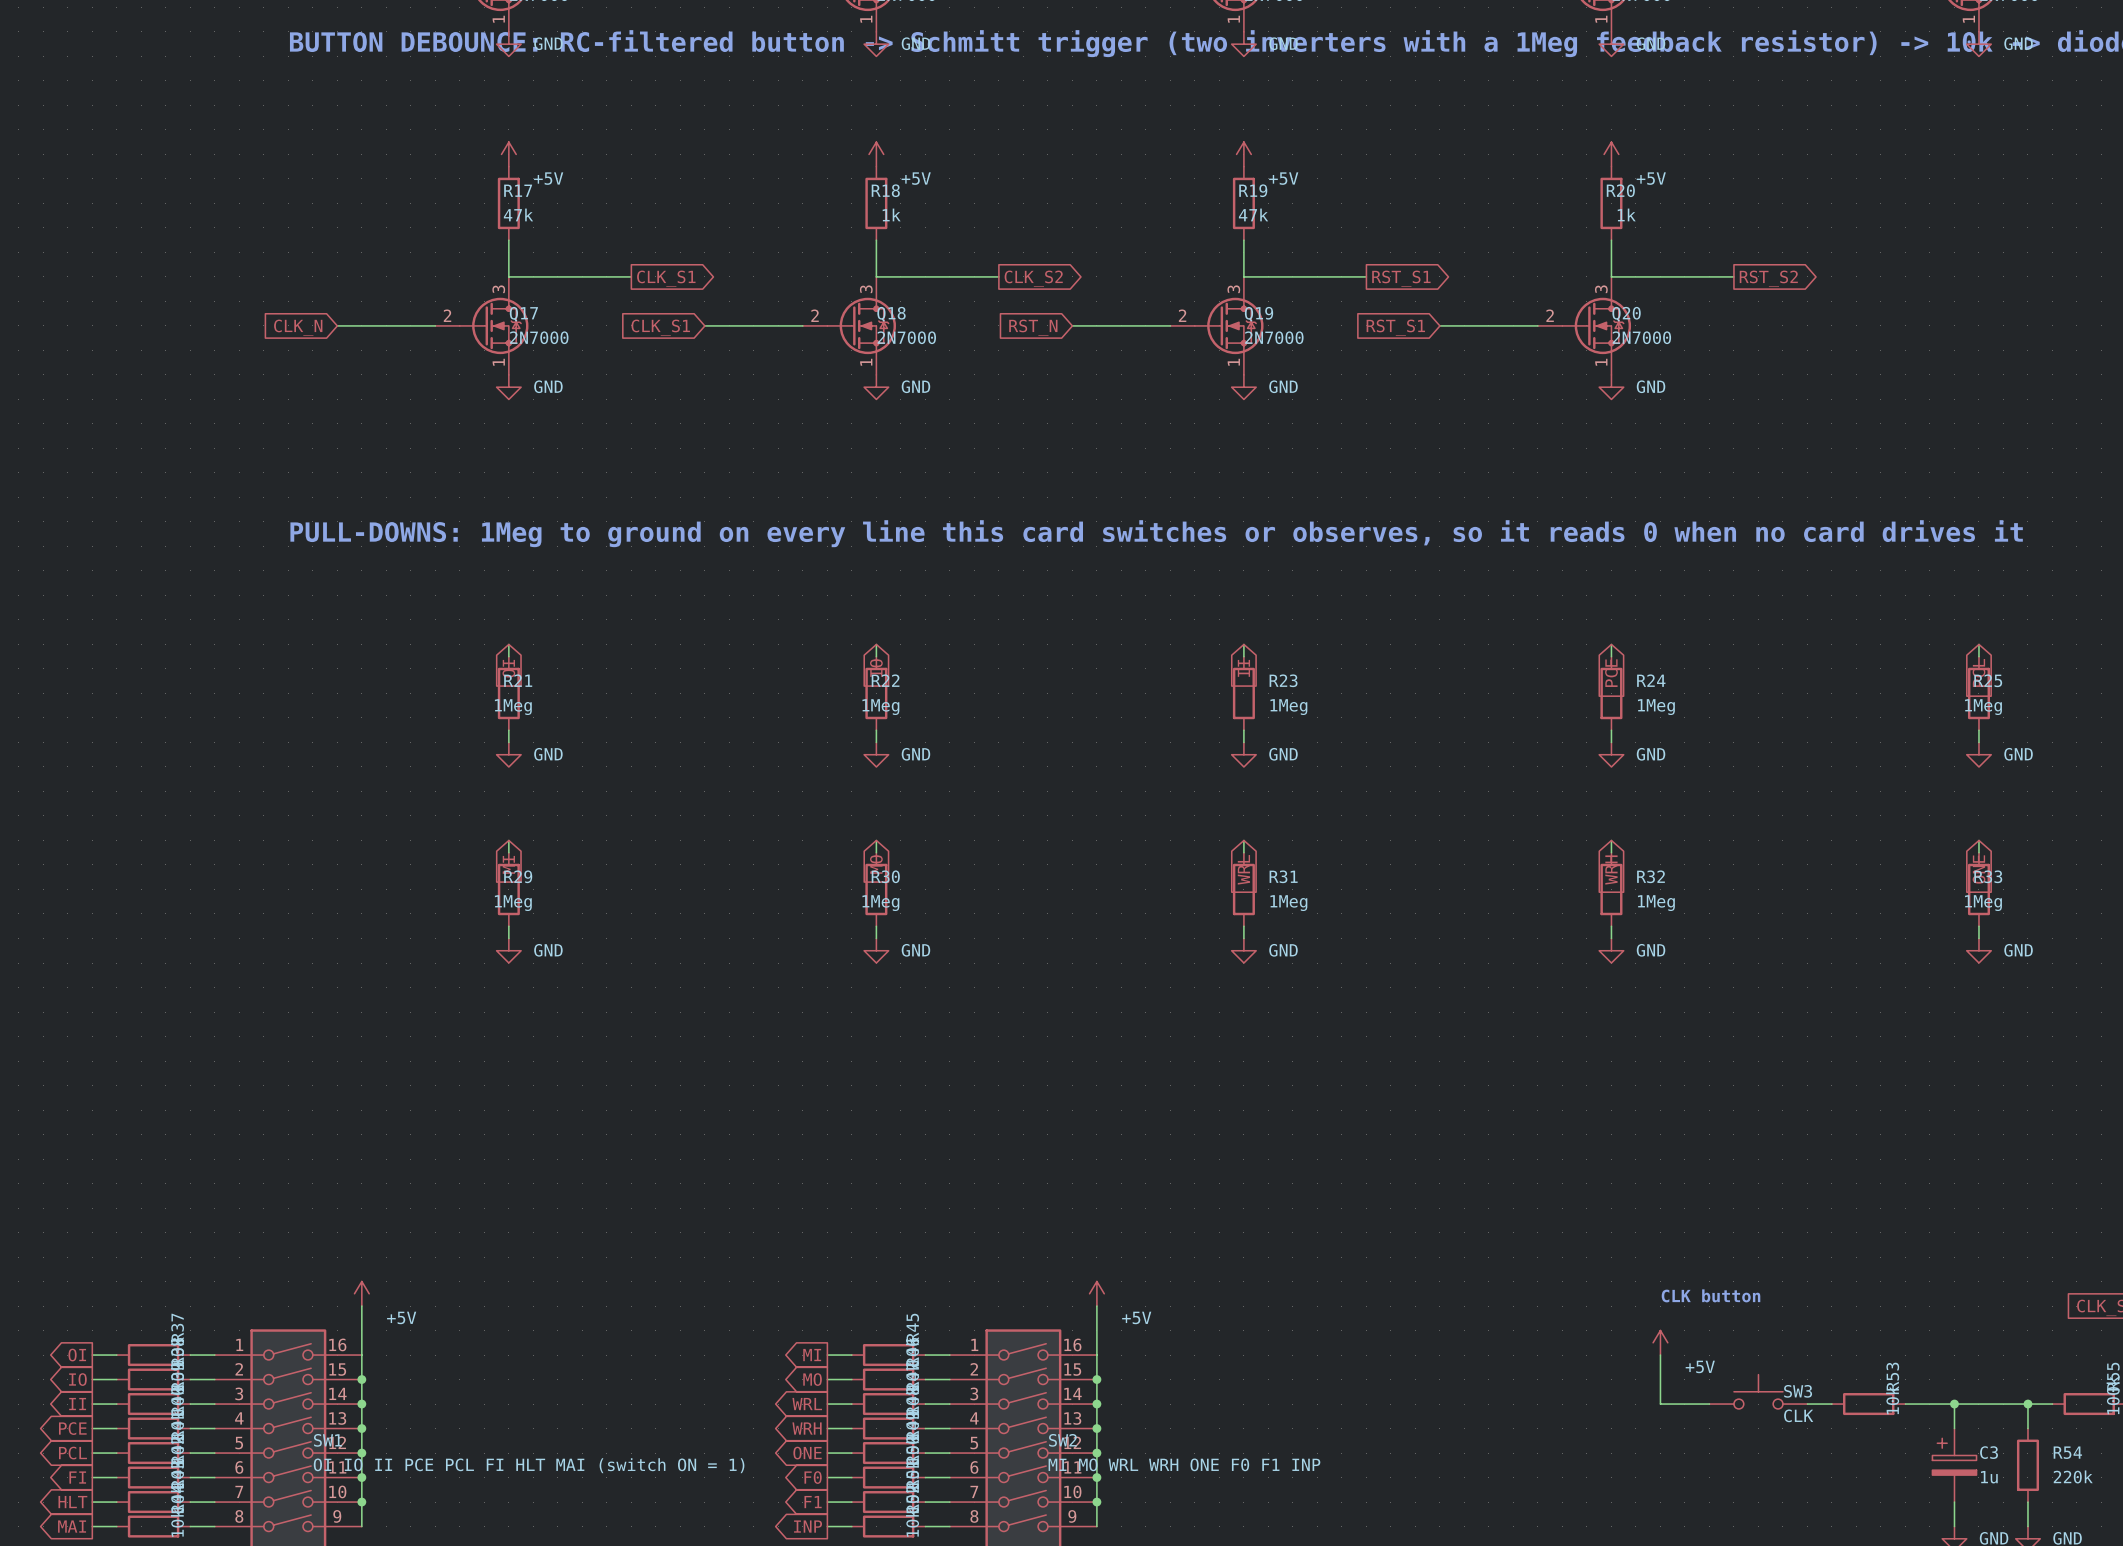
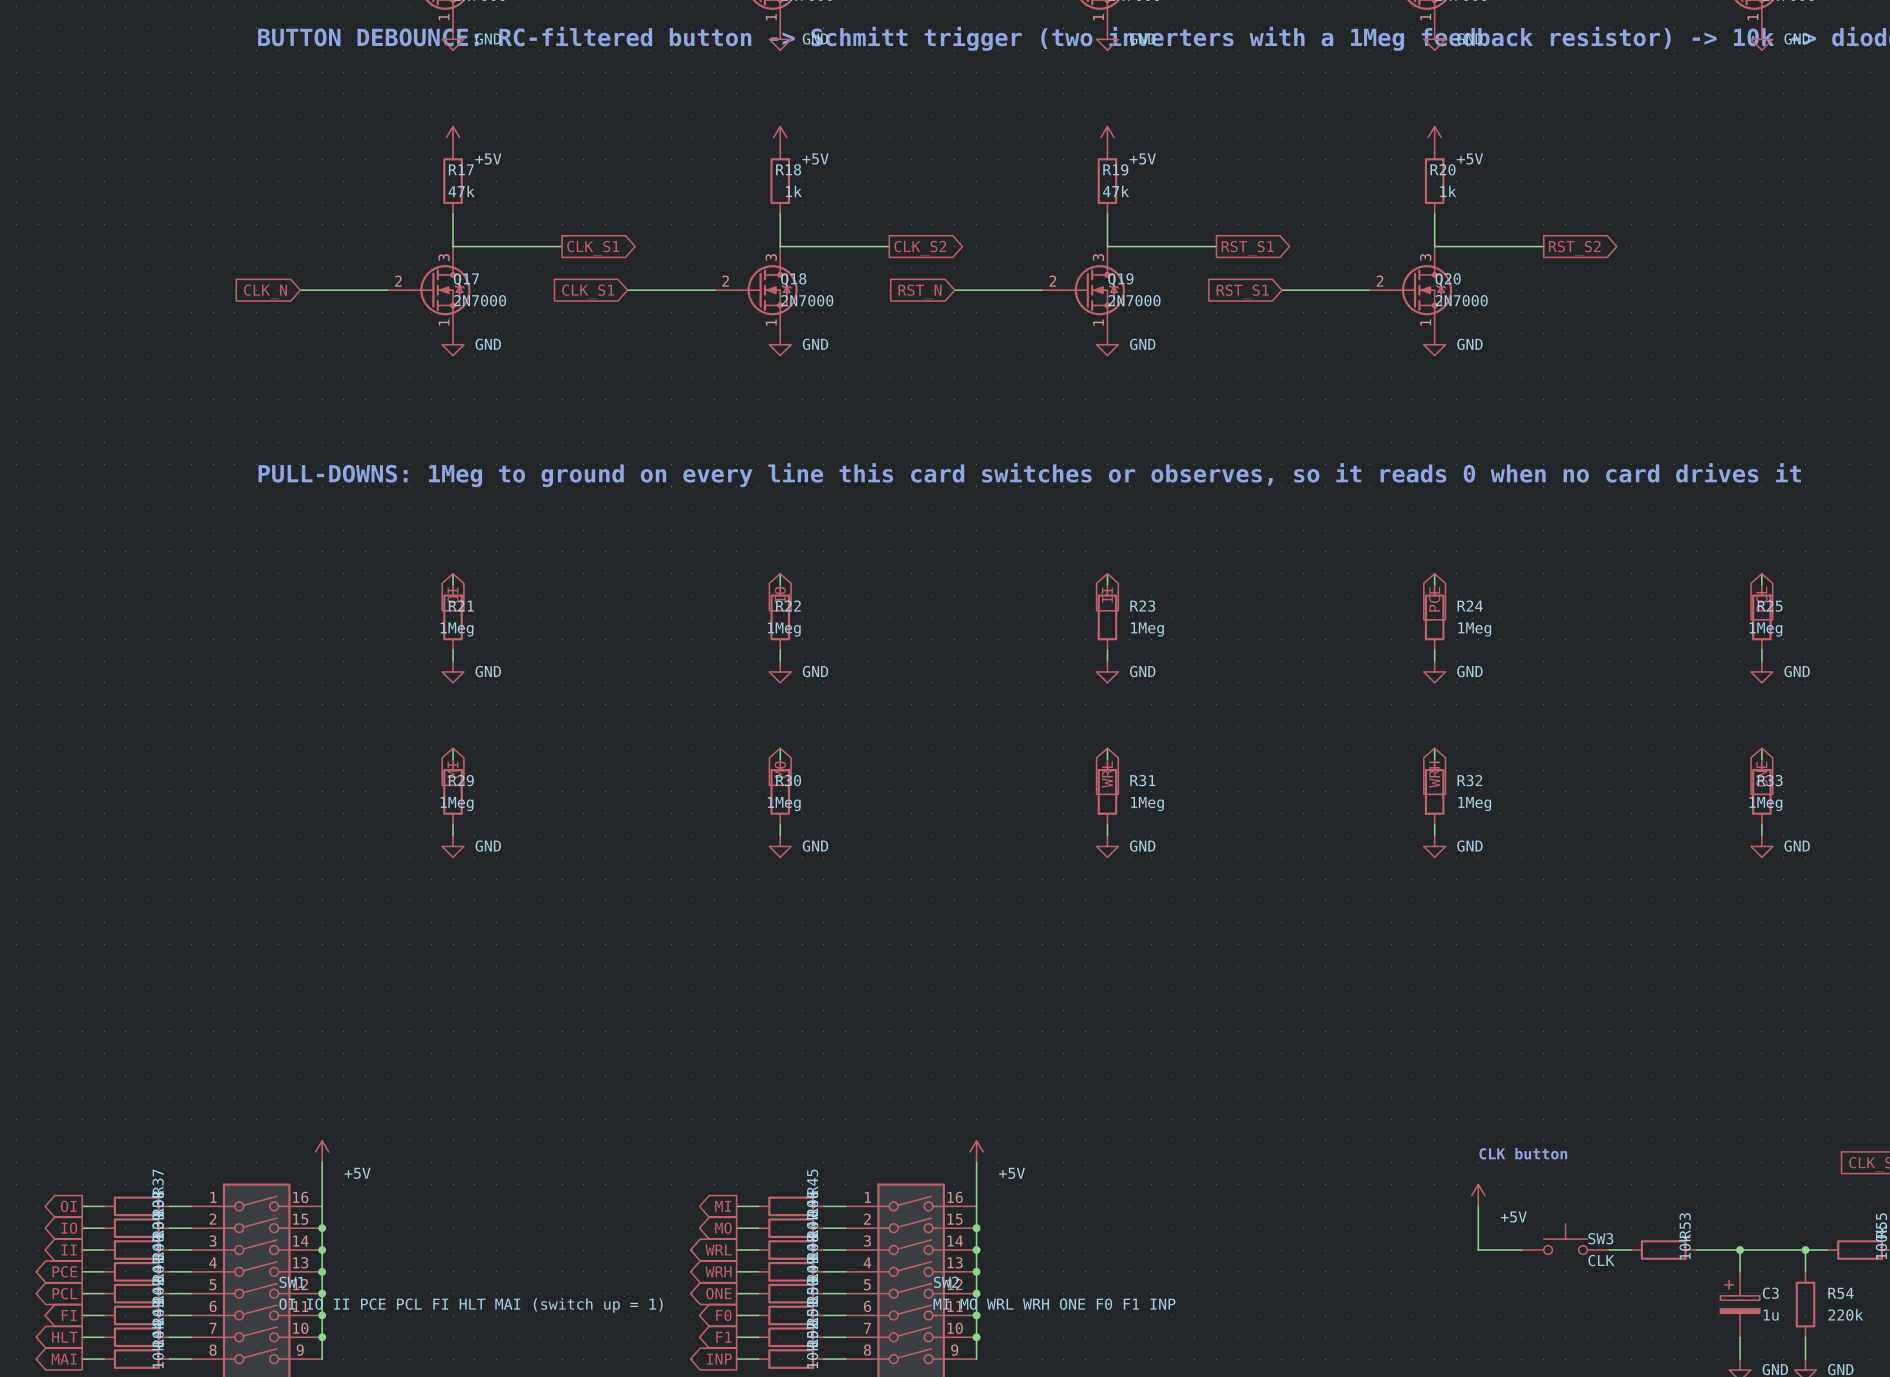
SW1 value: OI IO II PCE PCL FI HLT MAI (switch ON = 1) (529, 1465) -> OI IO II PCE PCL FI HLT MAI (switch up = 1) (471, 1305)

